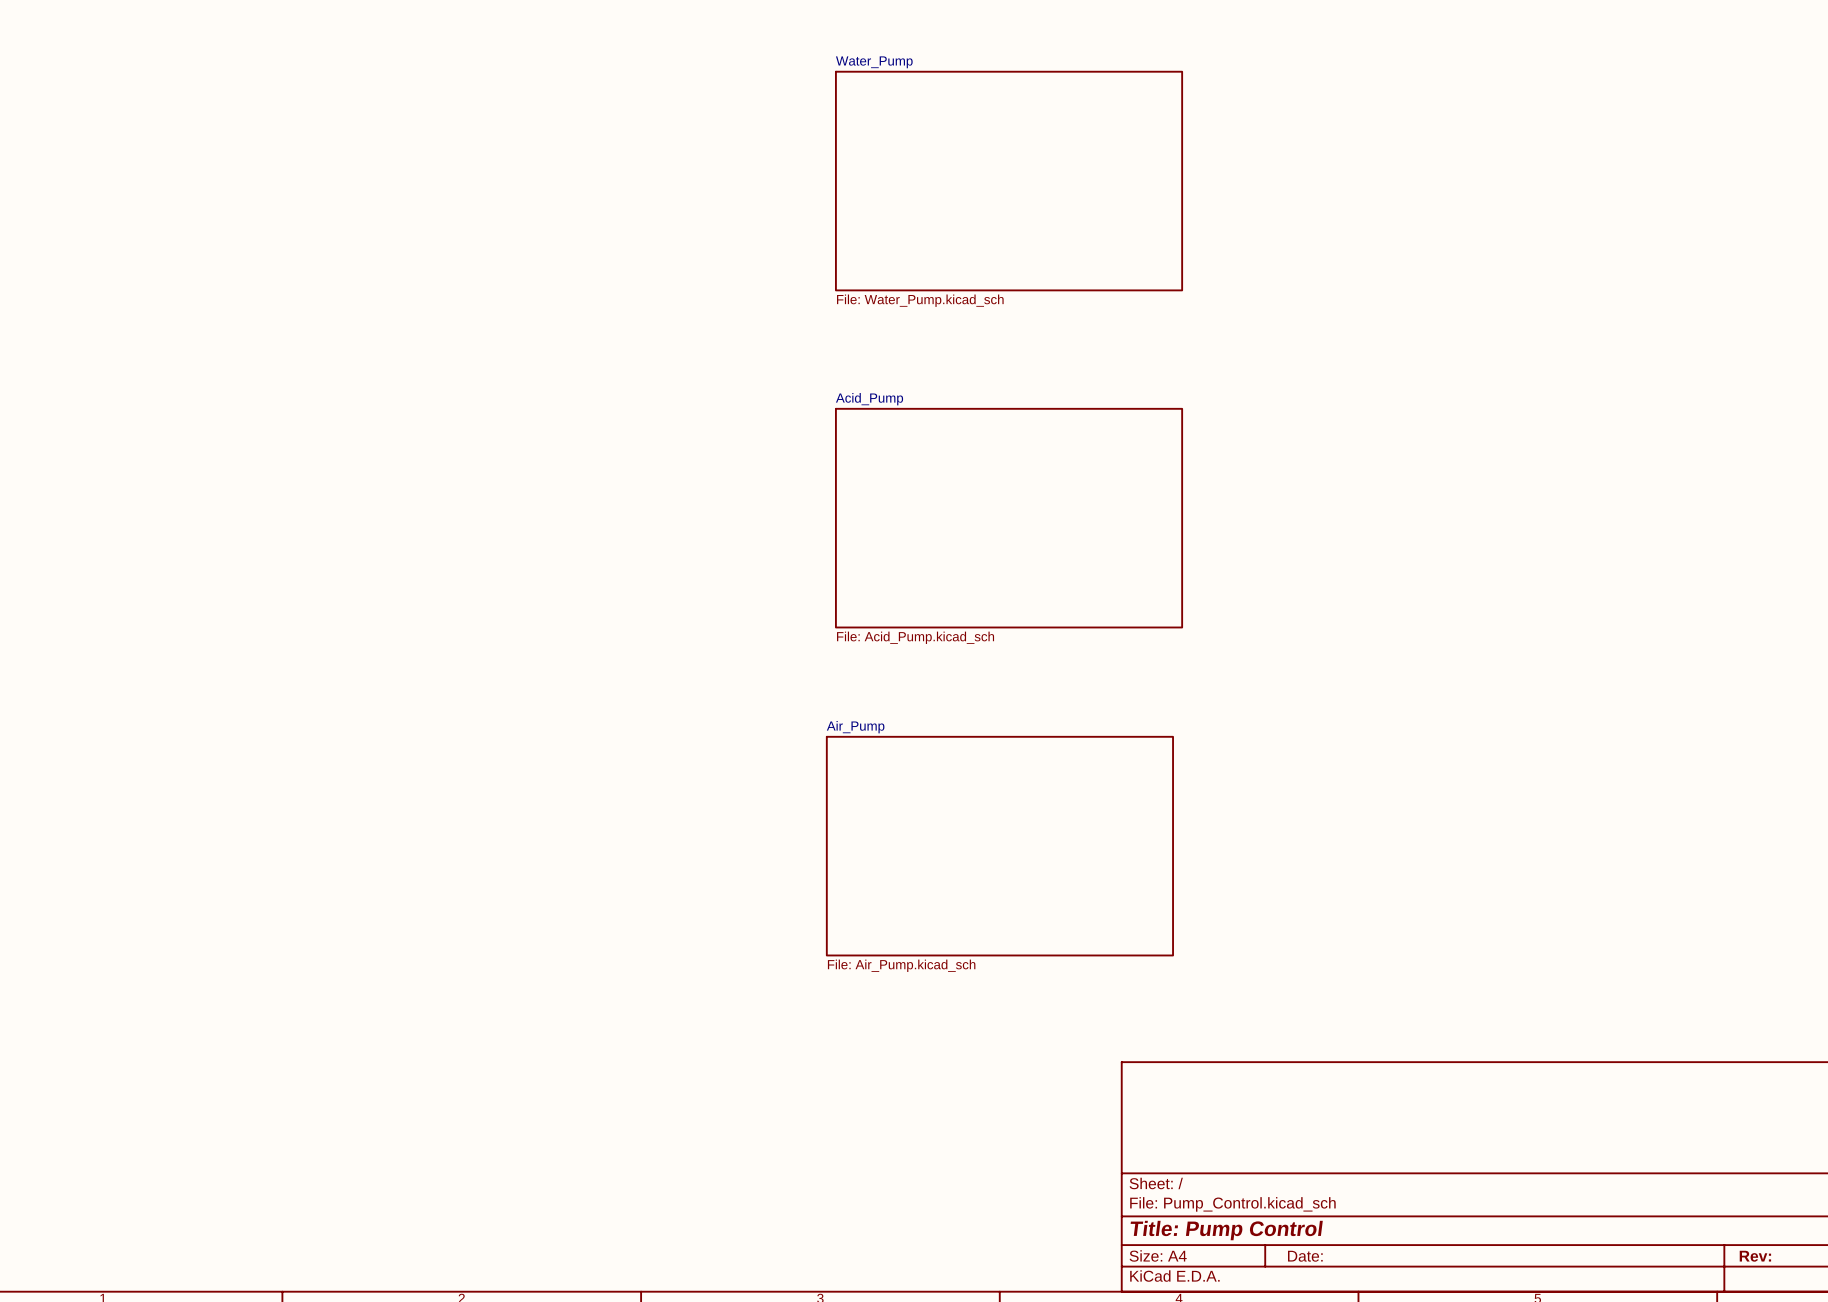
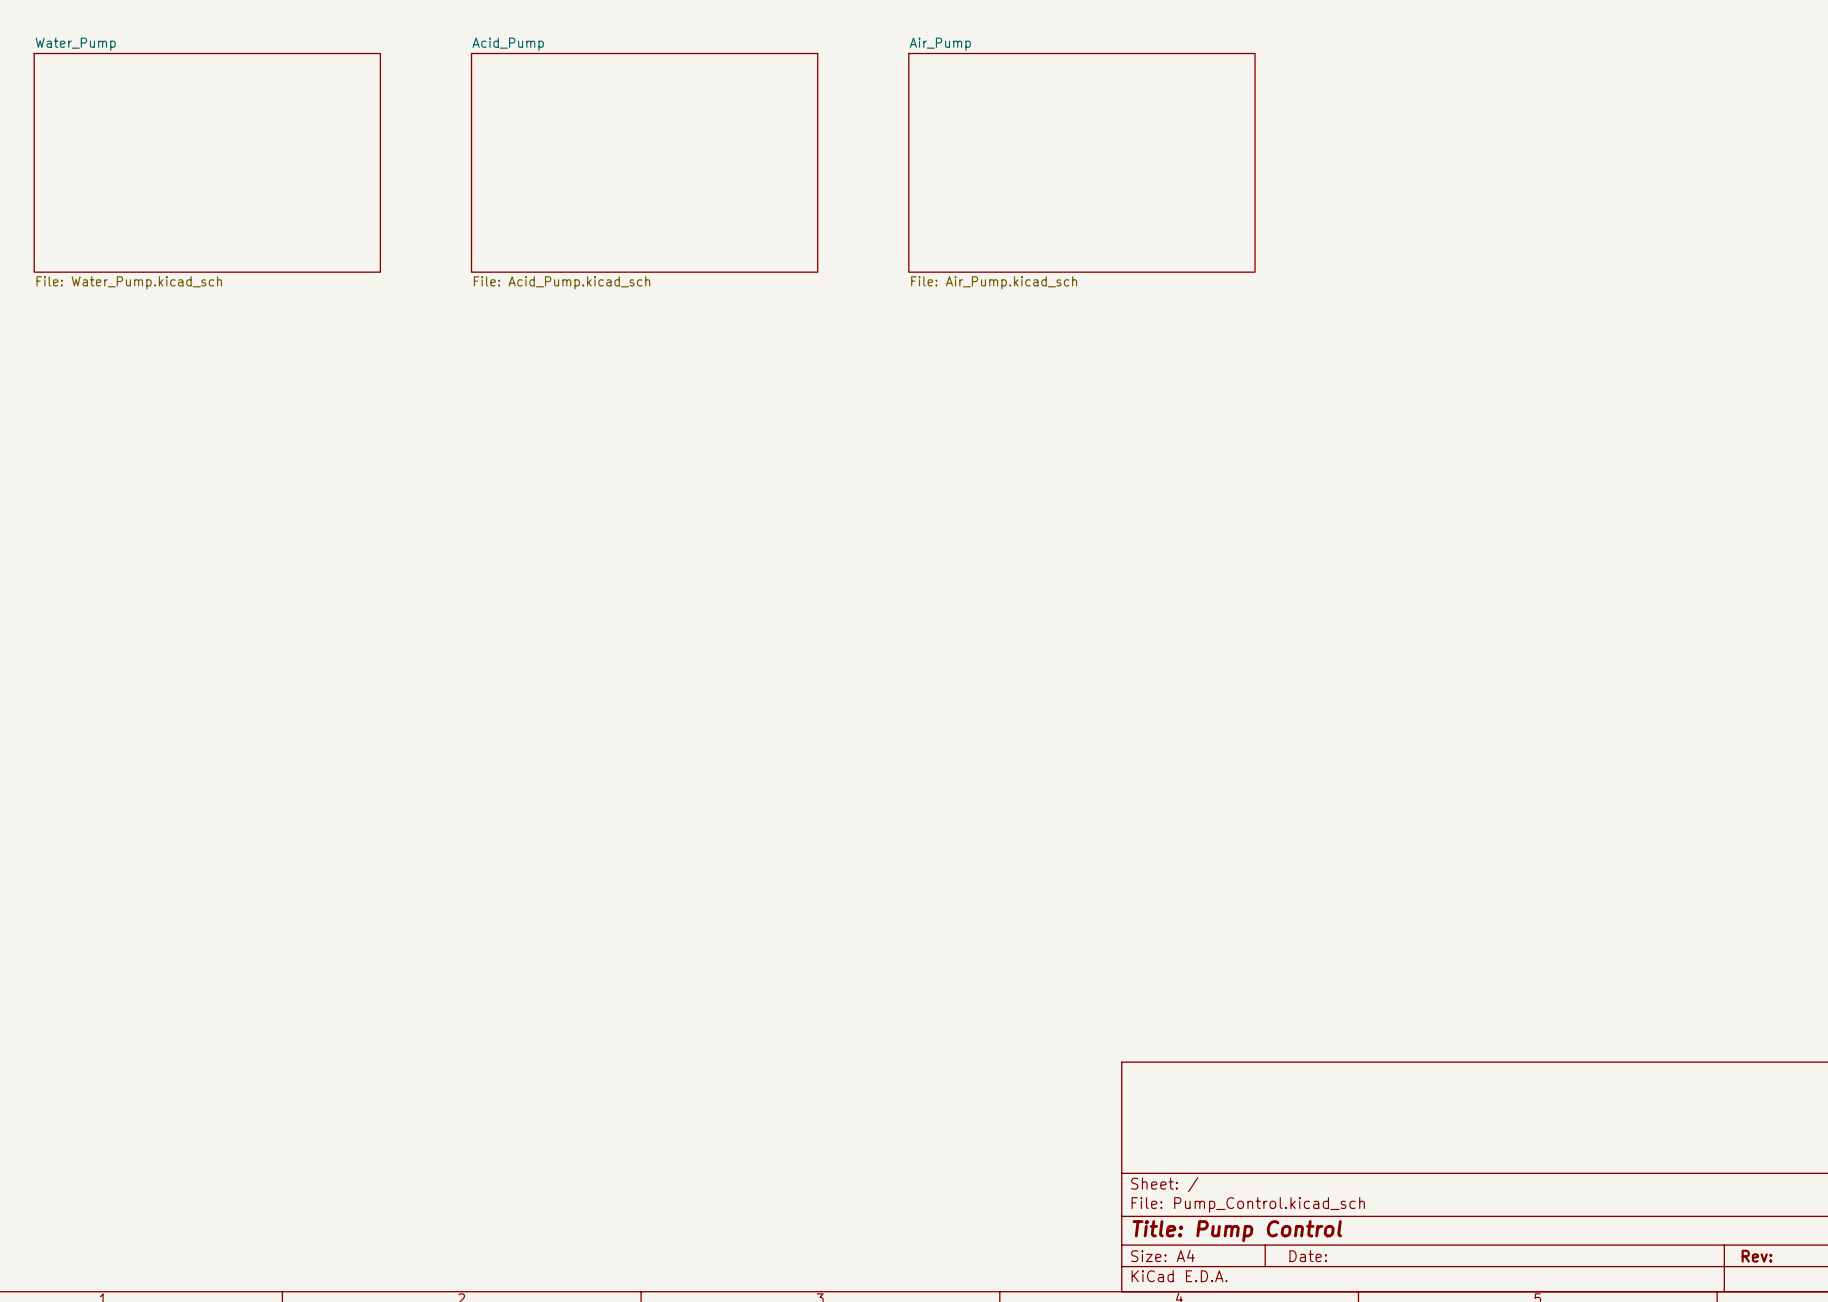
sheet Water_Pump: none -> File: Water_Pump.kicad_sch (207, 162)
sheet Acid_Pump: none -> File: Acid_Pump.kicad_sch (644, 162)
sheet Air_Pump: none -> File: Air_Pump.kicad_sch (1081, 162)
sheet Water_Pump: File: Water_Pump.kicad_sch (1009, 181) -> none
sheet Acid_Pump: File: Acid_Pump.kicad_sch (1009, 518) -> none
sheet Air_Pump: File: Air_Pump.kicad_sch (999, 846) -> none

